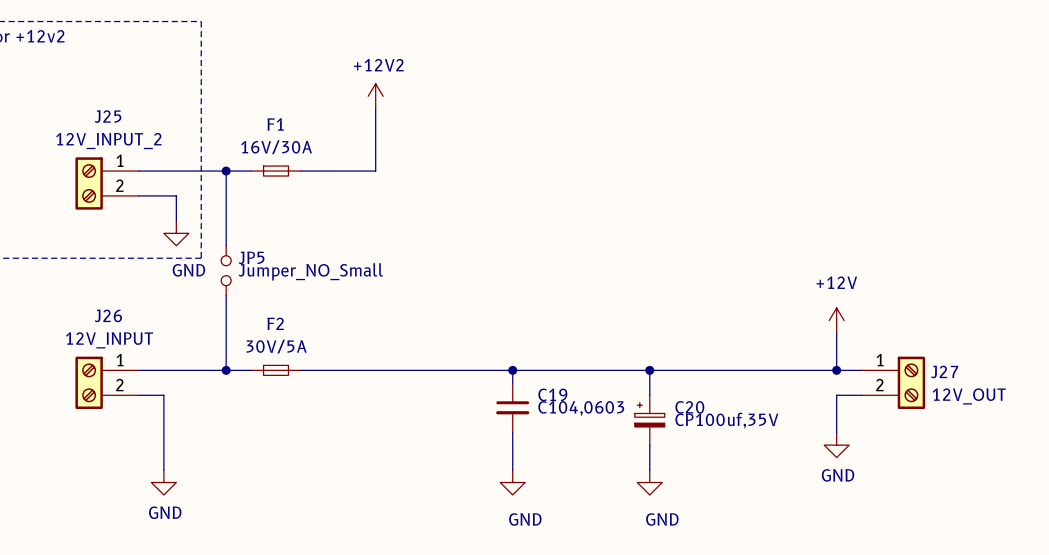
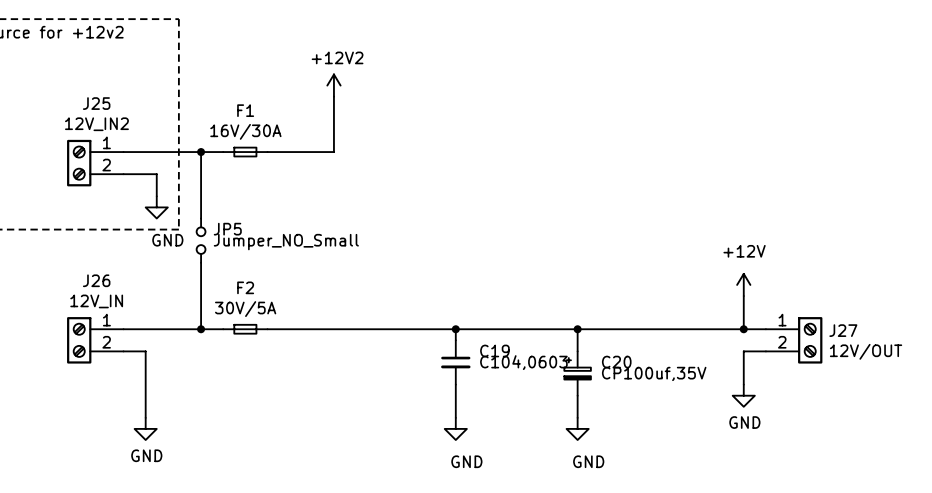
J25 value: 12V_INPUT_2 (108, 141) -> 12V_IN2 (96, 124)
J26 value: 12V_INPUT (109, 340) -> 12V_IN (96, 301)
J27 value: 12V_OUT (969, 396) -> 12V/OUT (866, 351)

